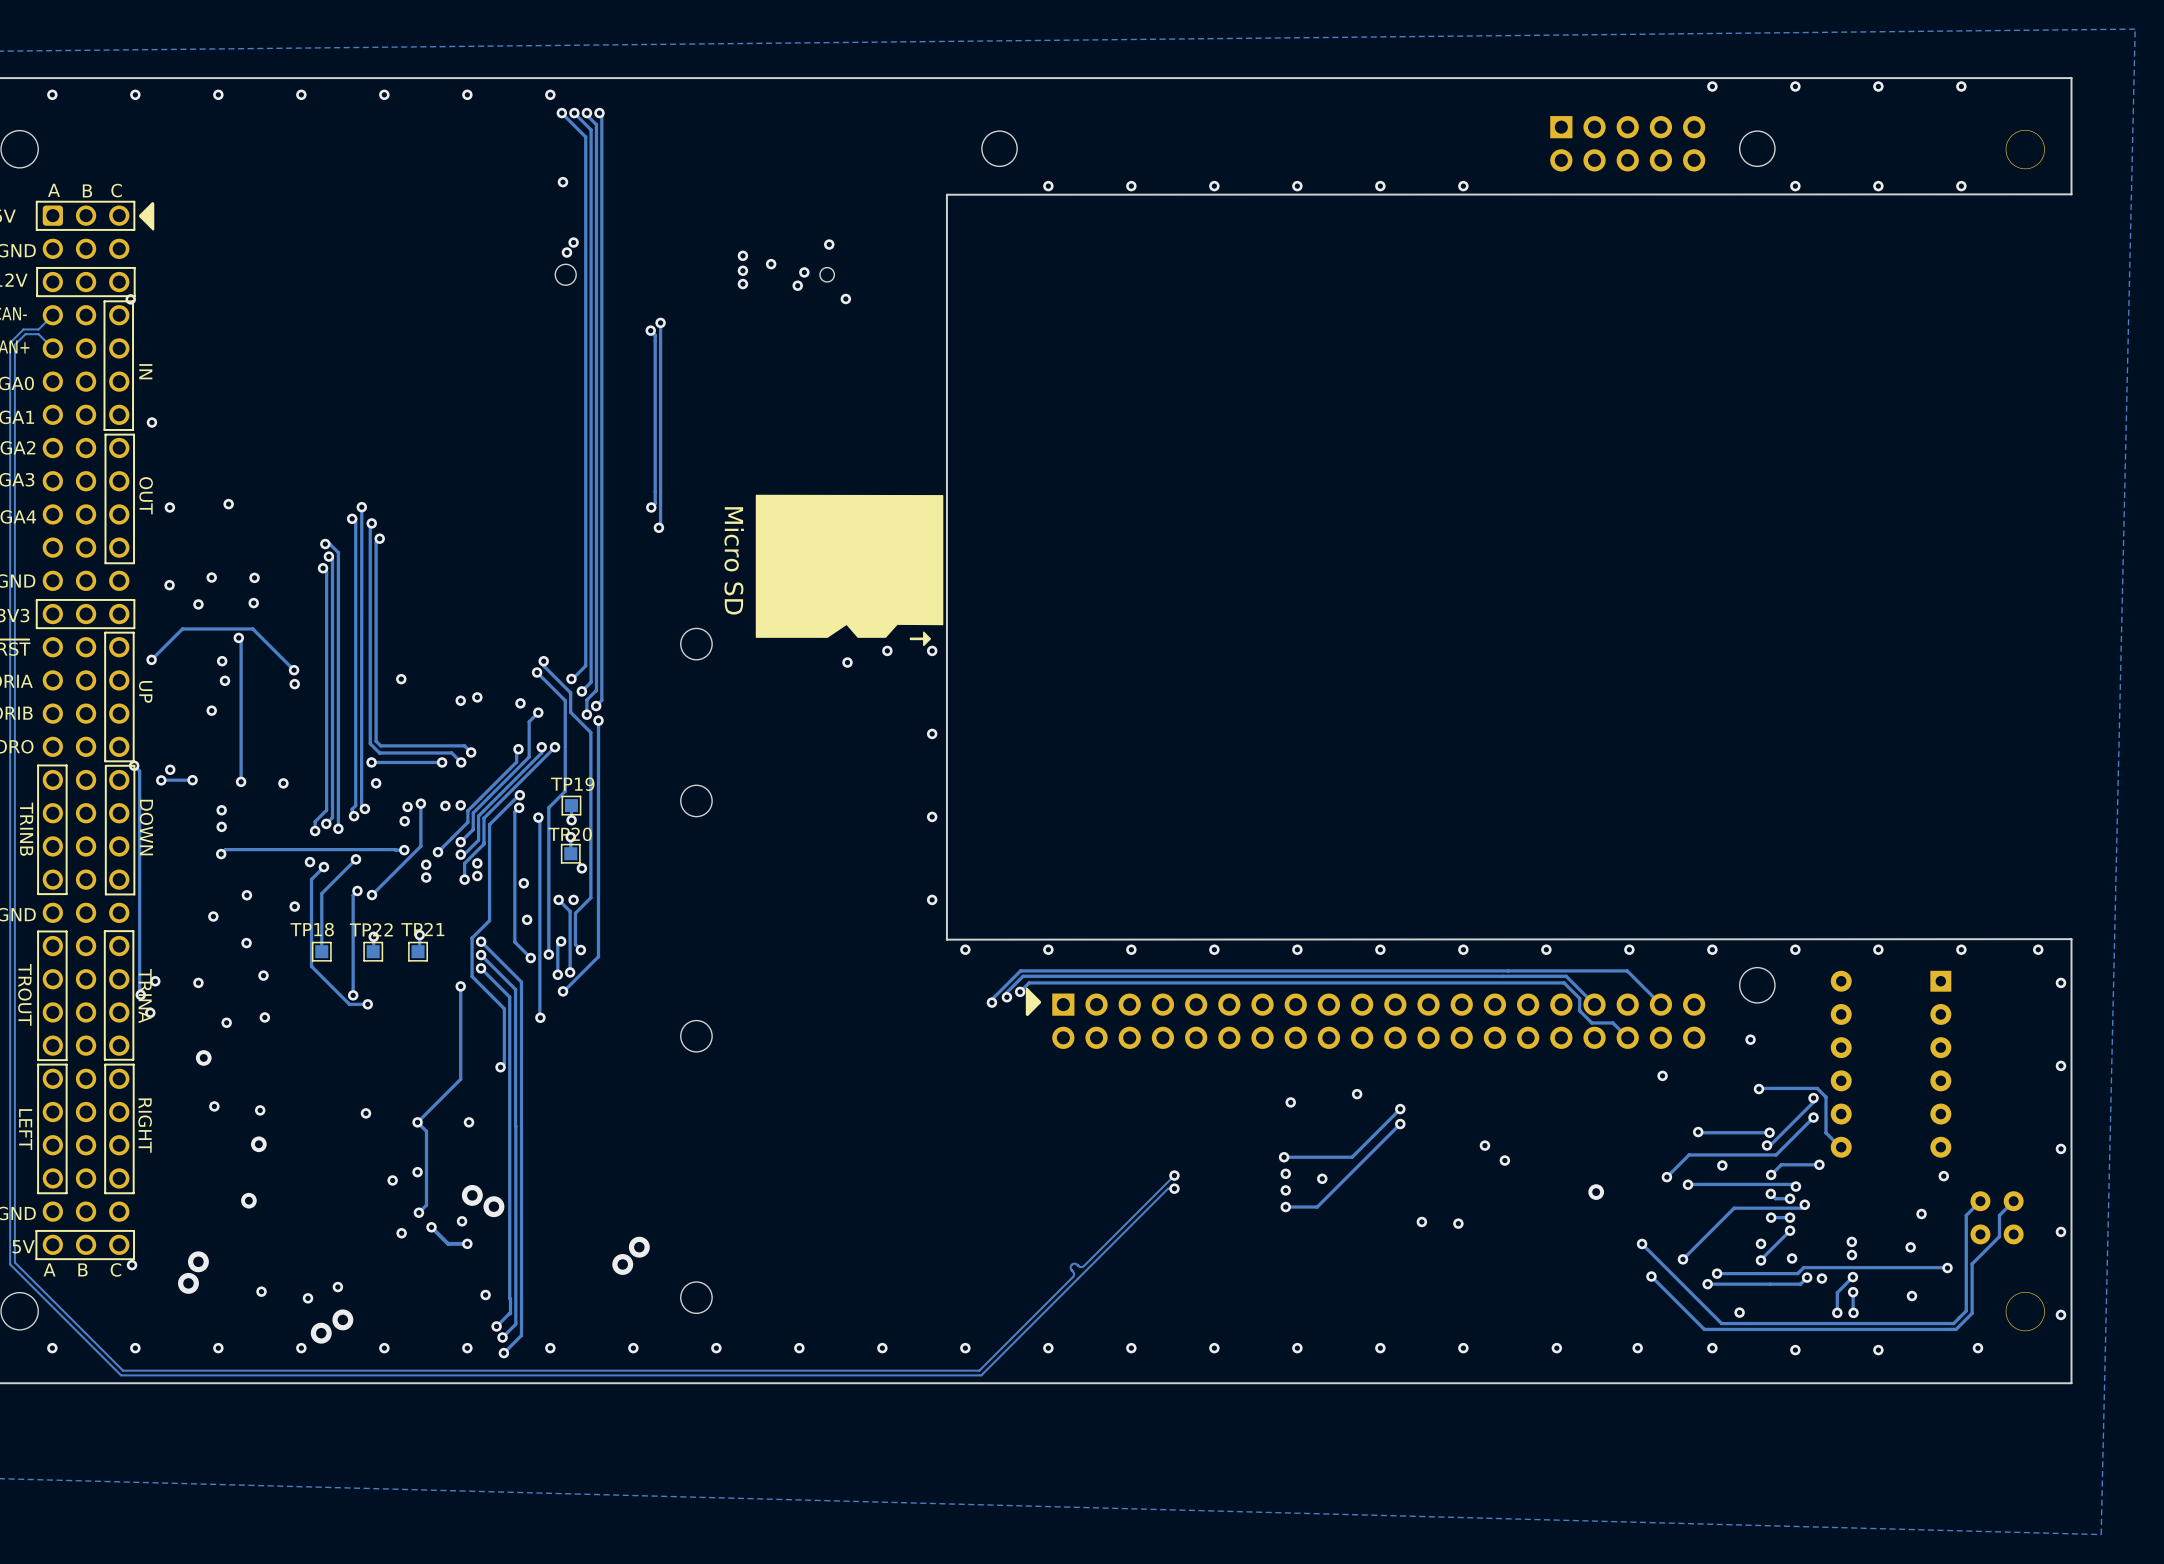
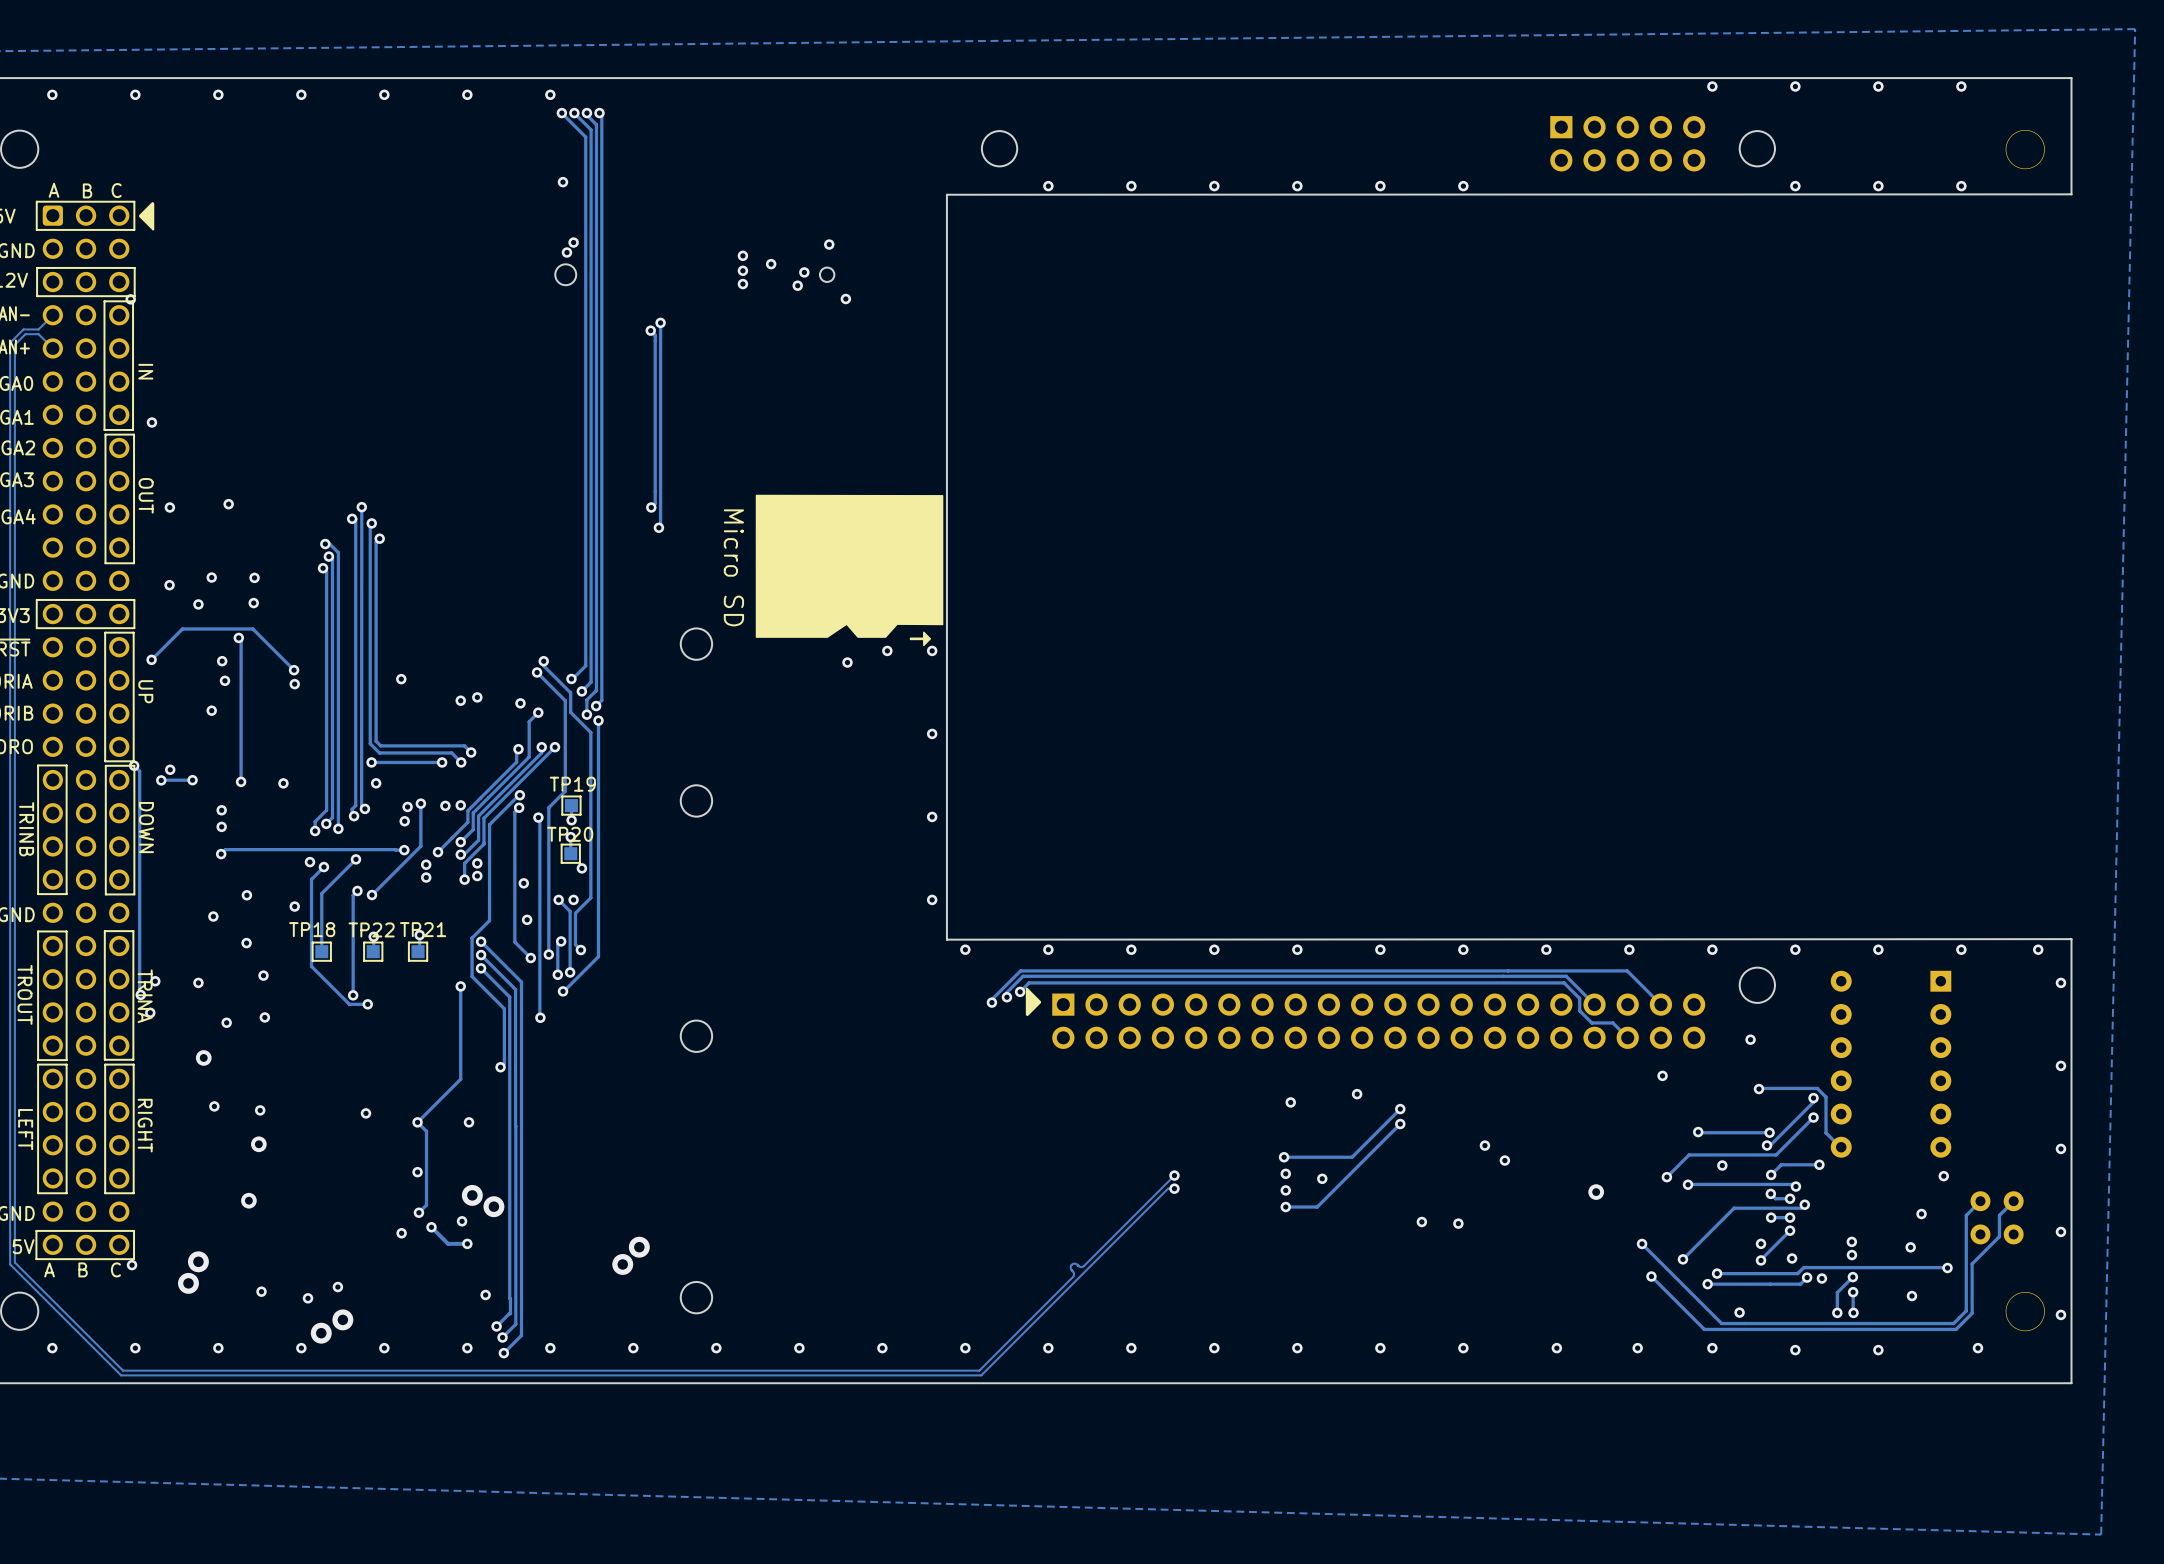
via: (392, 1180) -> none

